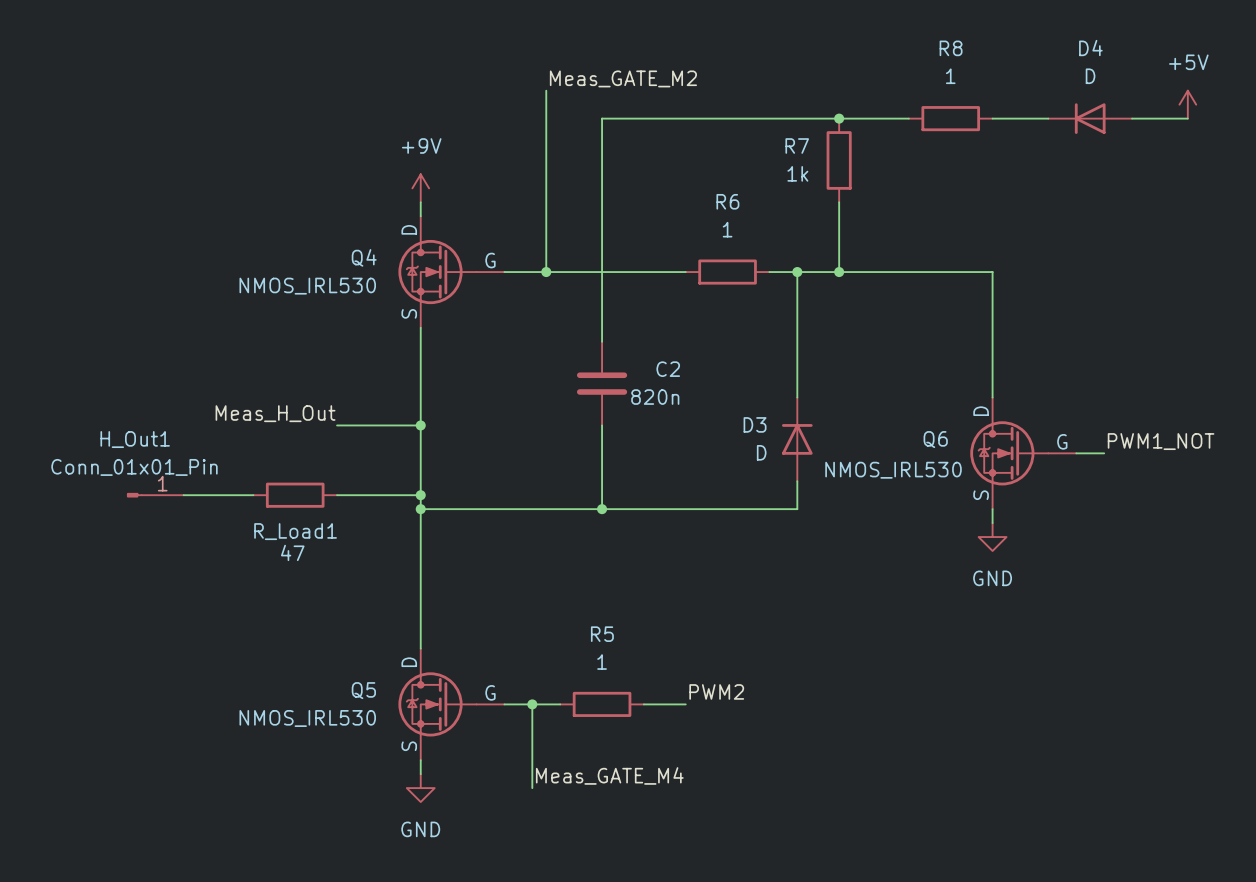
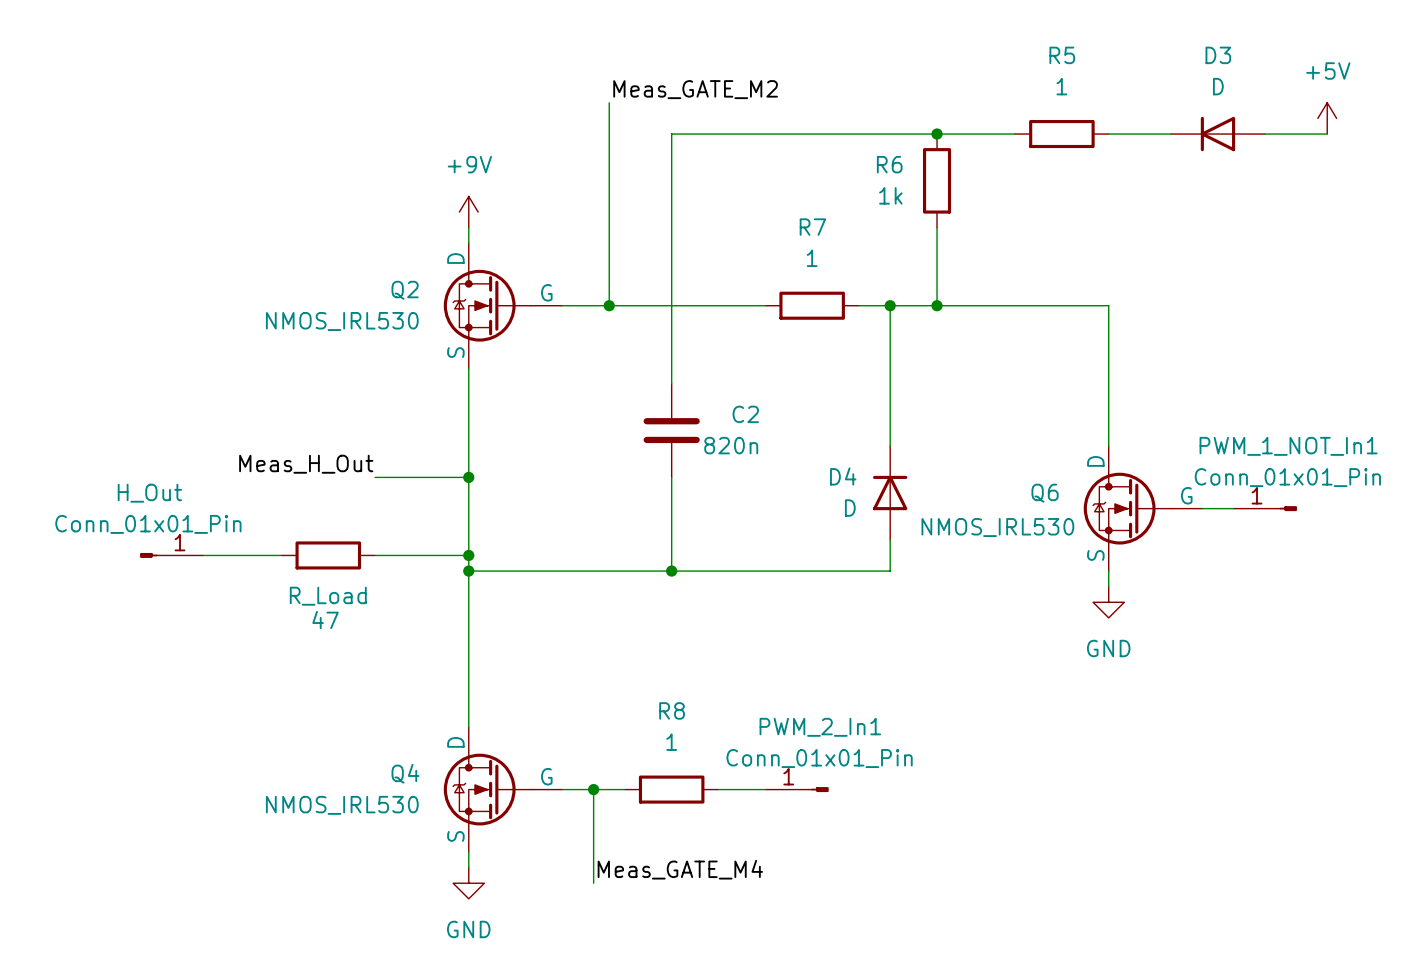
R8 name: R8 (951, 48) -> R5 (1062, 55)
D4 name: D4 (1090, 48) -> D3 (1218, 55)
R7 name: R7 (797, 145) -> R6 (889, 164)
R6 name: R6 (727, 201) -> R7 (812, 227)
Q4 name: Q4 (364, 257) -> Q2 (405, 290)
D3 name: D3 (755, 424) -> D4 (843, 476)
H_Out1 name: H_Out1 (135, 439) -> H_Out (149, 493)
label: PWM1_NOT (1161, 441) -> none
PWM_1_NOT_In1: none -> Conn_01x01_Pin (1265, 508)
R_Load1 name: R_Load1 (295, 531) -> R_Load (328, 596)
R5 name: R5 (602, 634) -> R8 (672, 710)
Q5 name: Q5 (363, 690) -> Q4 (405, 773)
label: PWM2 (716, 691) -> none
PWM_2_In1: none -> Conn_01x01_Pin (797, 789)

